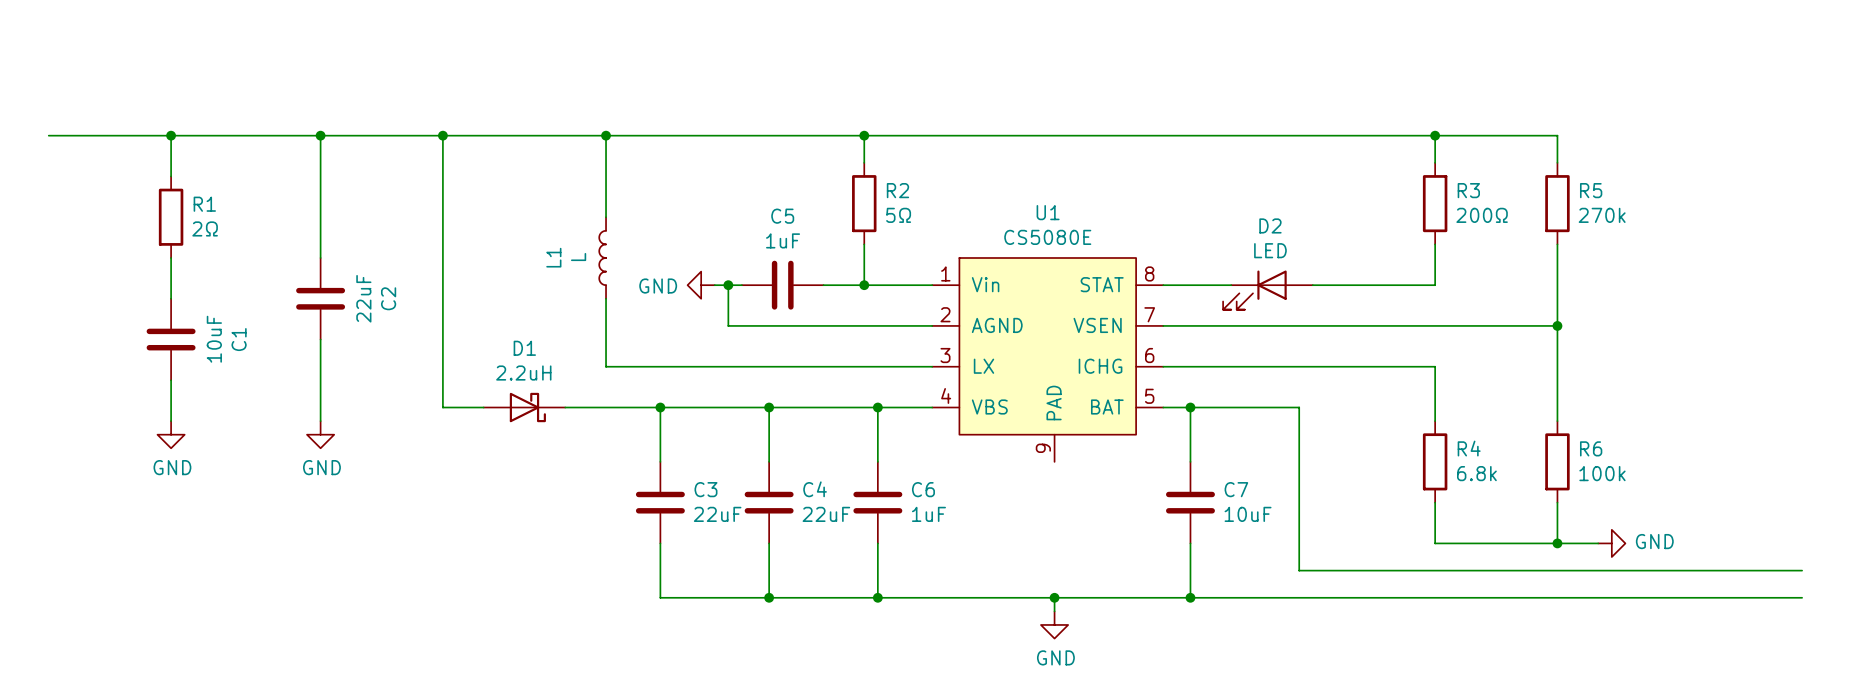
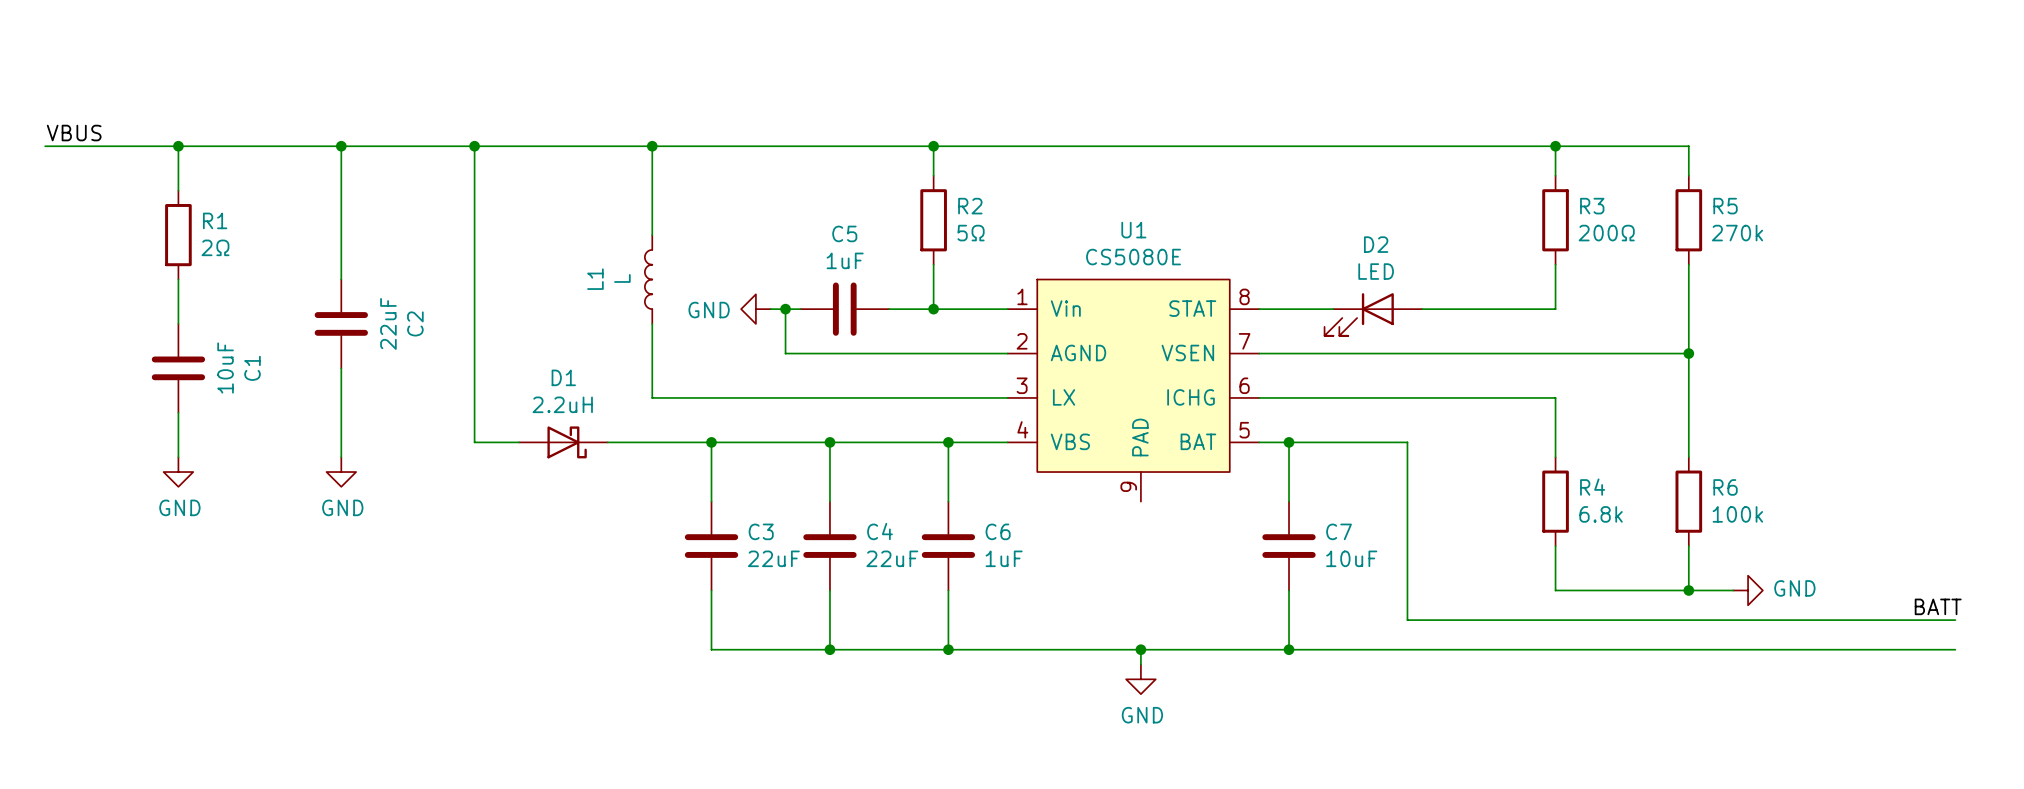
label: none -> VBUS (74, 133)
label: none -> BATT (1938, 606)

